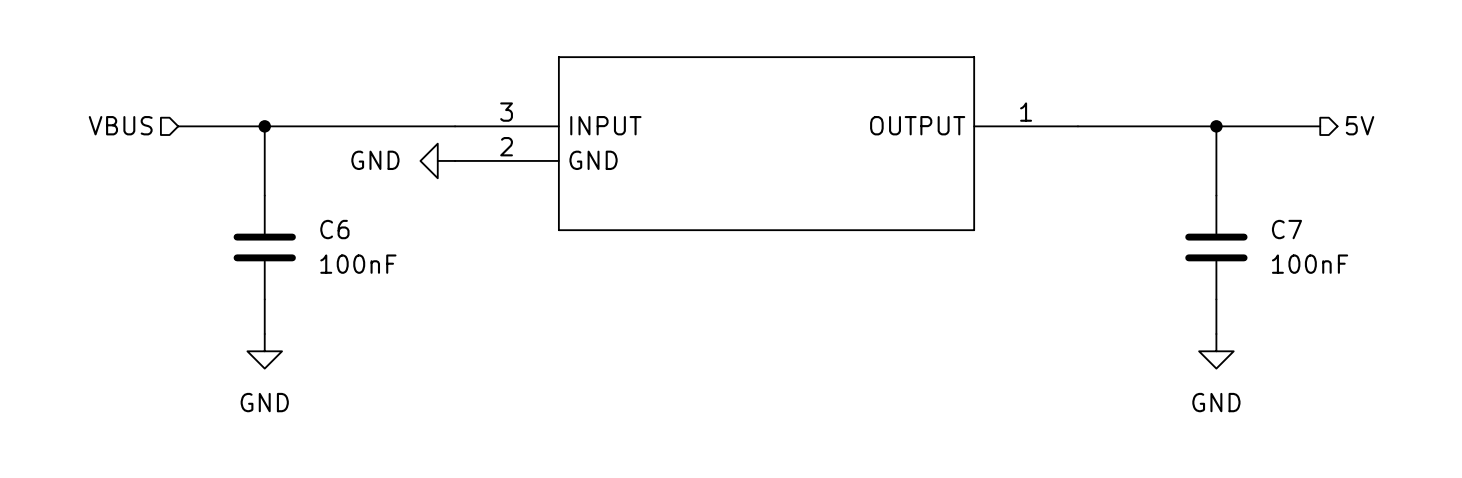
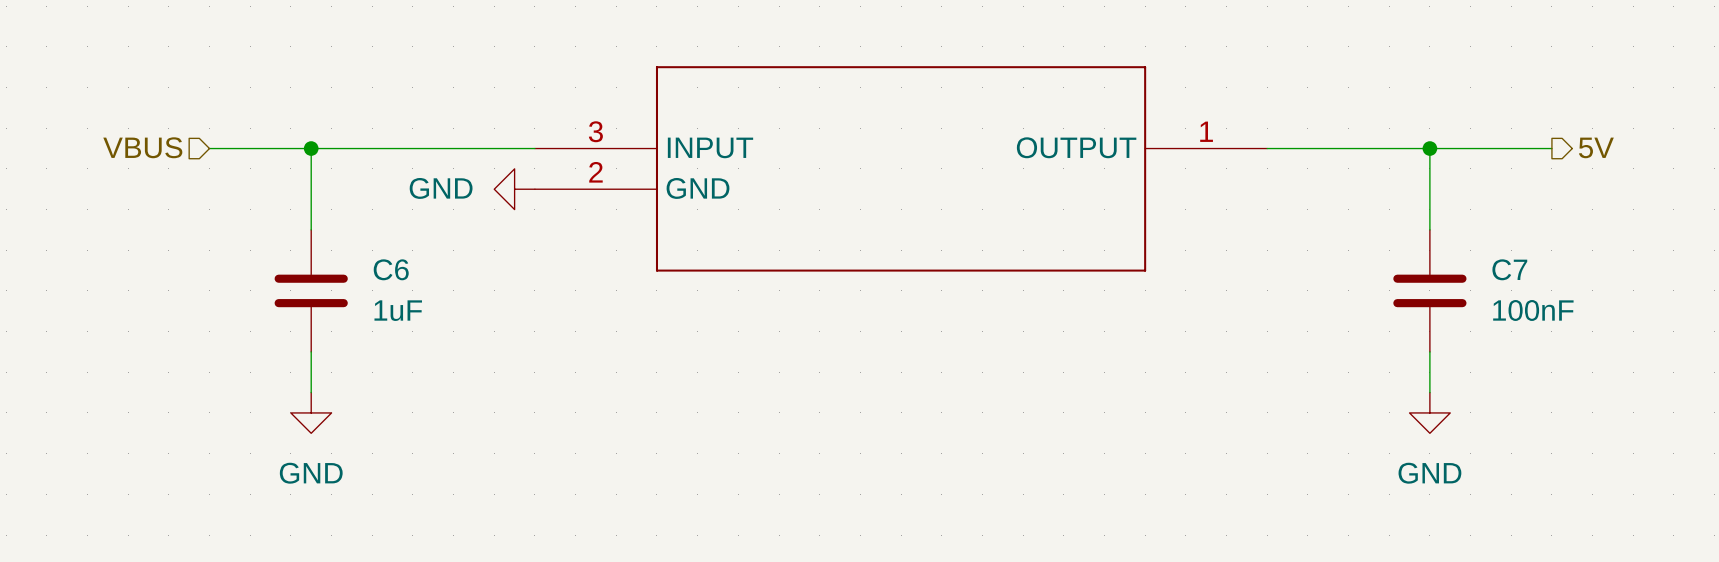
C6 value: 100nF (358, 264) -> 1uF (398, 310)

